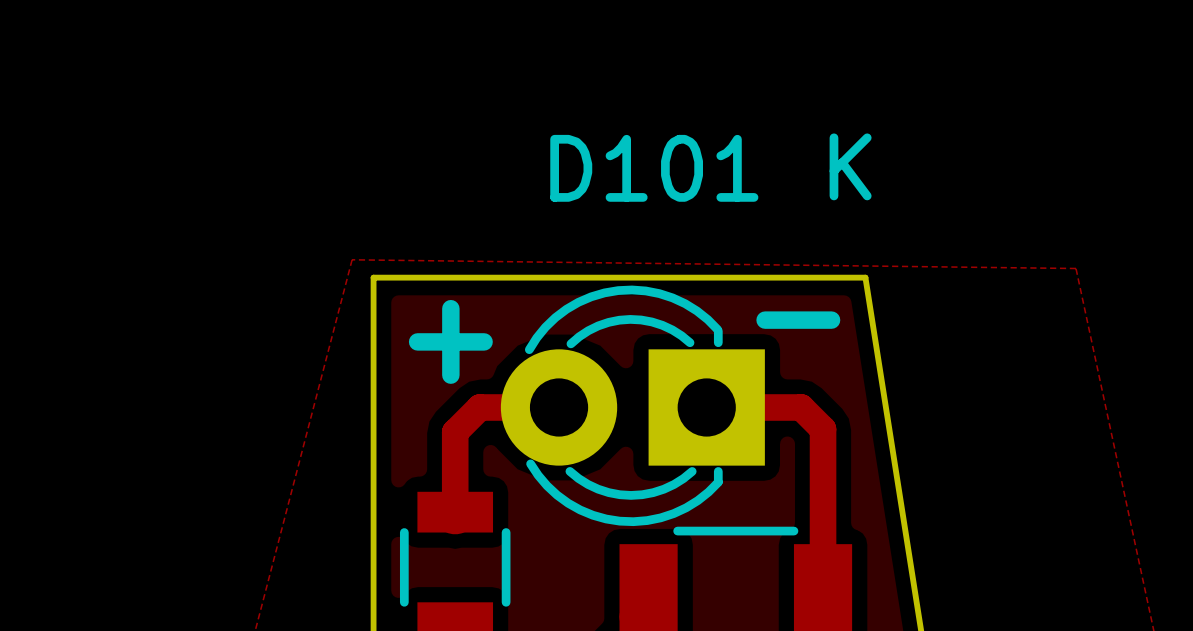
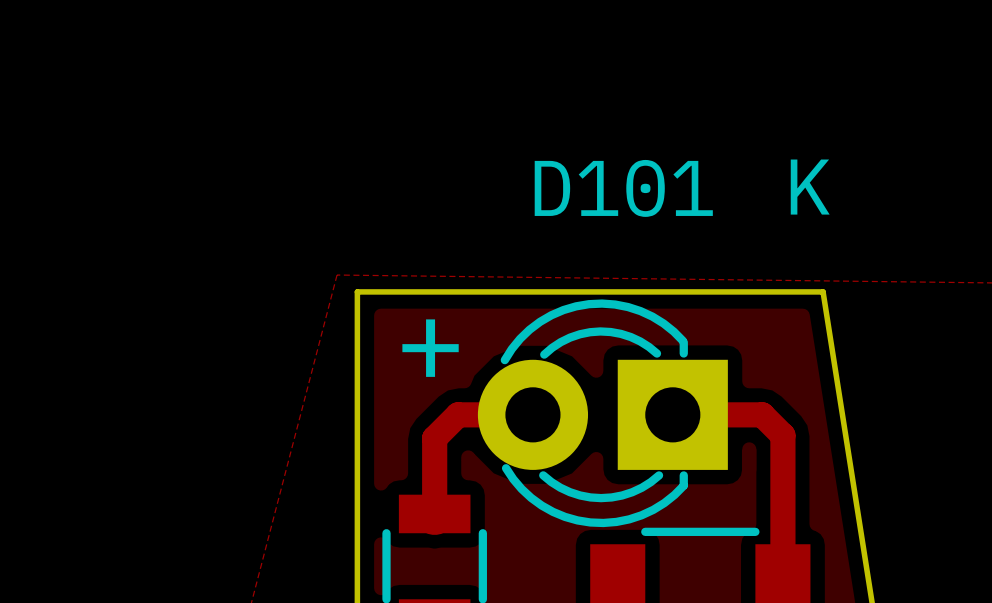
text: - (798, 320) -> none

